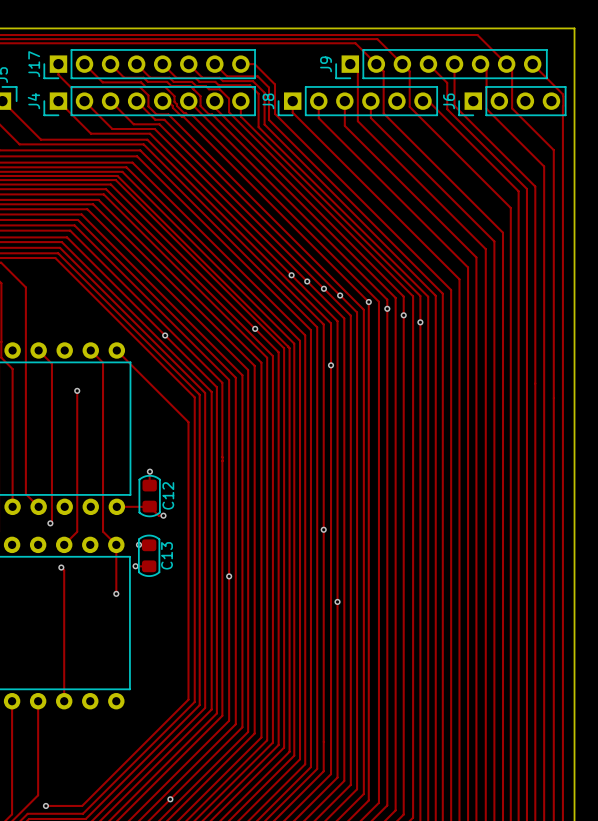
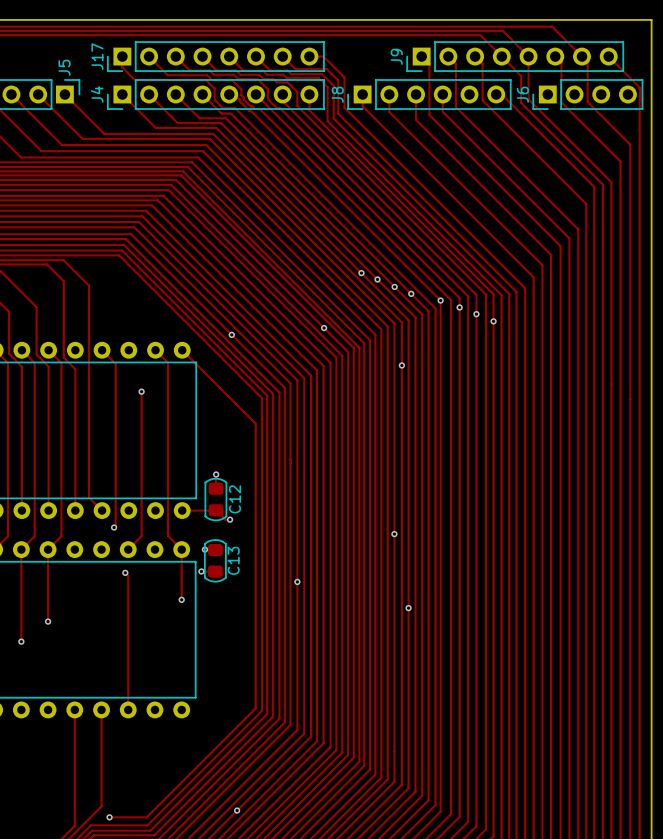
track: (377, 39) (402, 64) -> (449, 30) (502, 30) (528, 56)
track: (355, 43) (376, 64) -> (427, 35) (480, 35) (501, 56)

